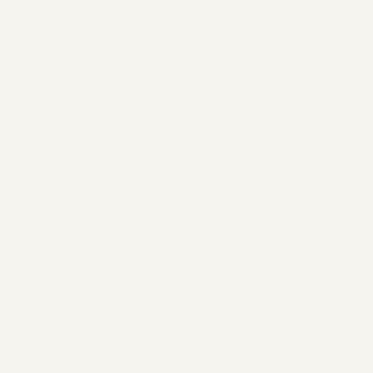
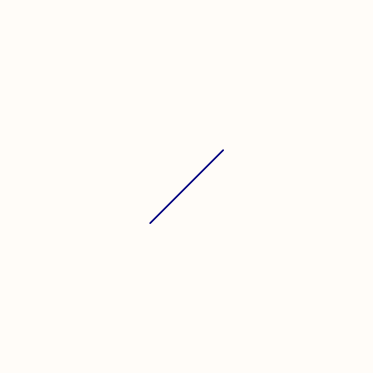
wire: none -> (223, 150) (150, 223)

